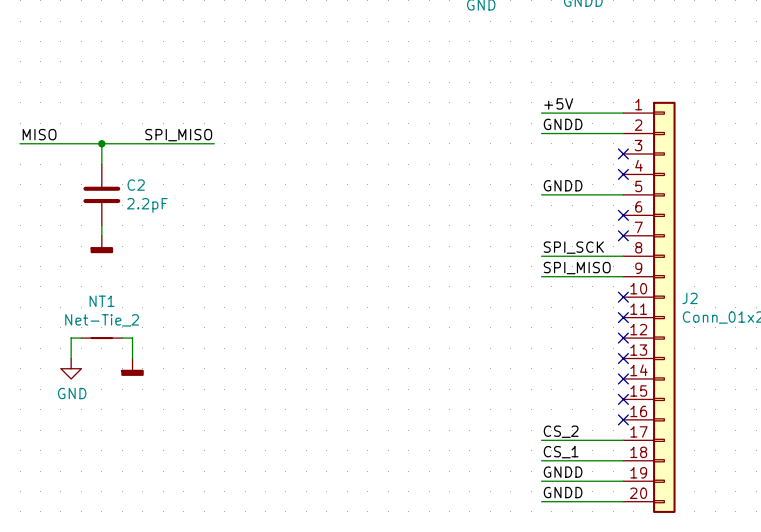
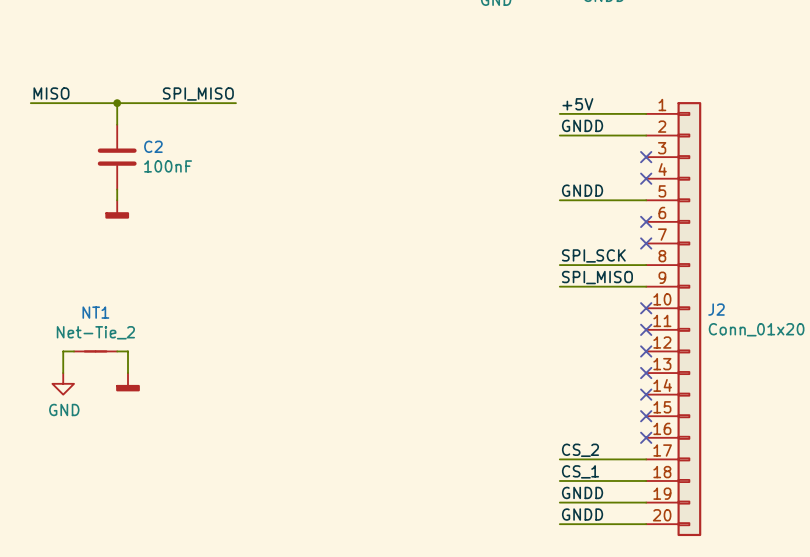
label position: MISO (39, 134) -> MISO (51, 93)
label position: SPI_MISO (178, 135) -> SPI_MISO (198, 94)
wire: (20, 143) (214, 143) -> (30, 103) (235, 103)
wire: (101, 143) (101, 164) -> (117, 103) (117, 124)
junction position: (101, 143) -> (117, 103)
C2 position: (101, 194) -> (117, 157)
C2 value: 2.2pF (147, 205) -> 100nF (168, 166)
wire: (101, 225) (101, 235) -> (117, 189) (117, 200)
power symbol position: (101, 244) -> (117, 209)

